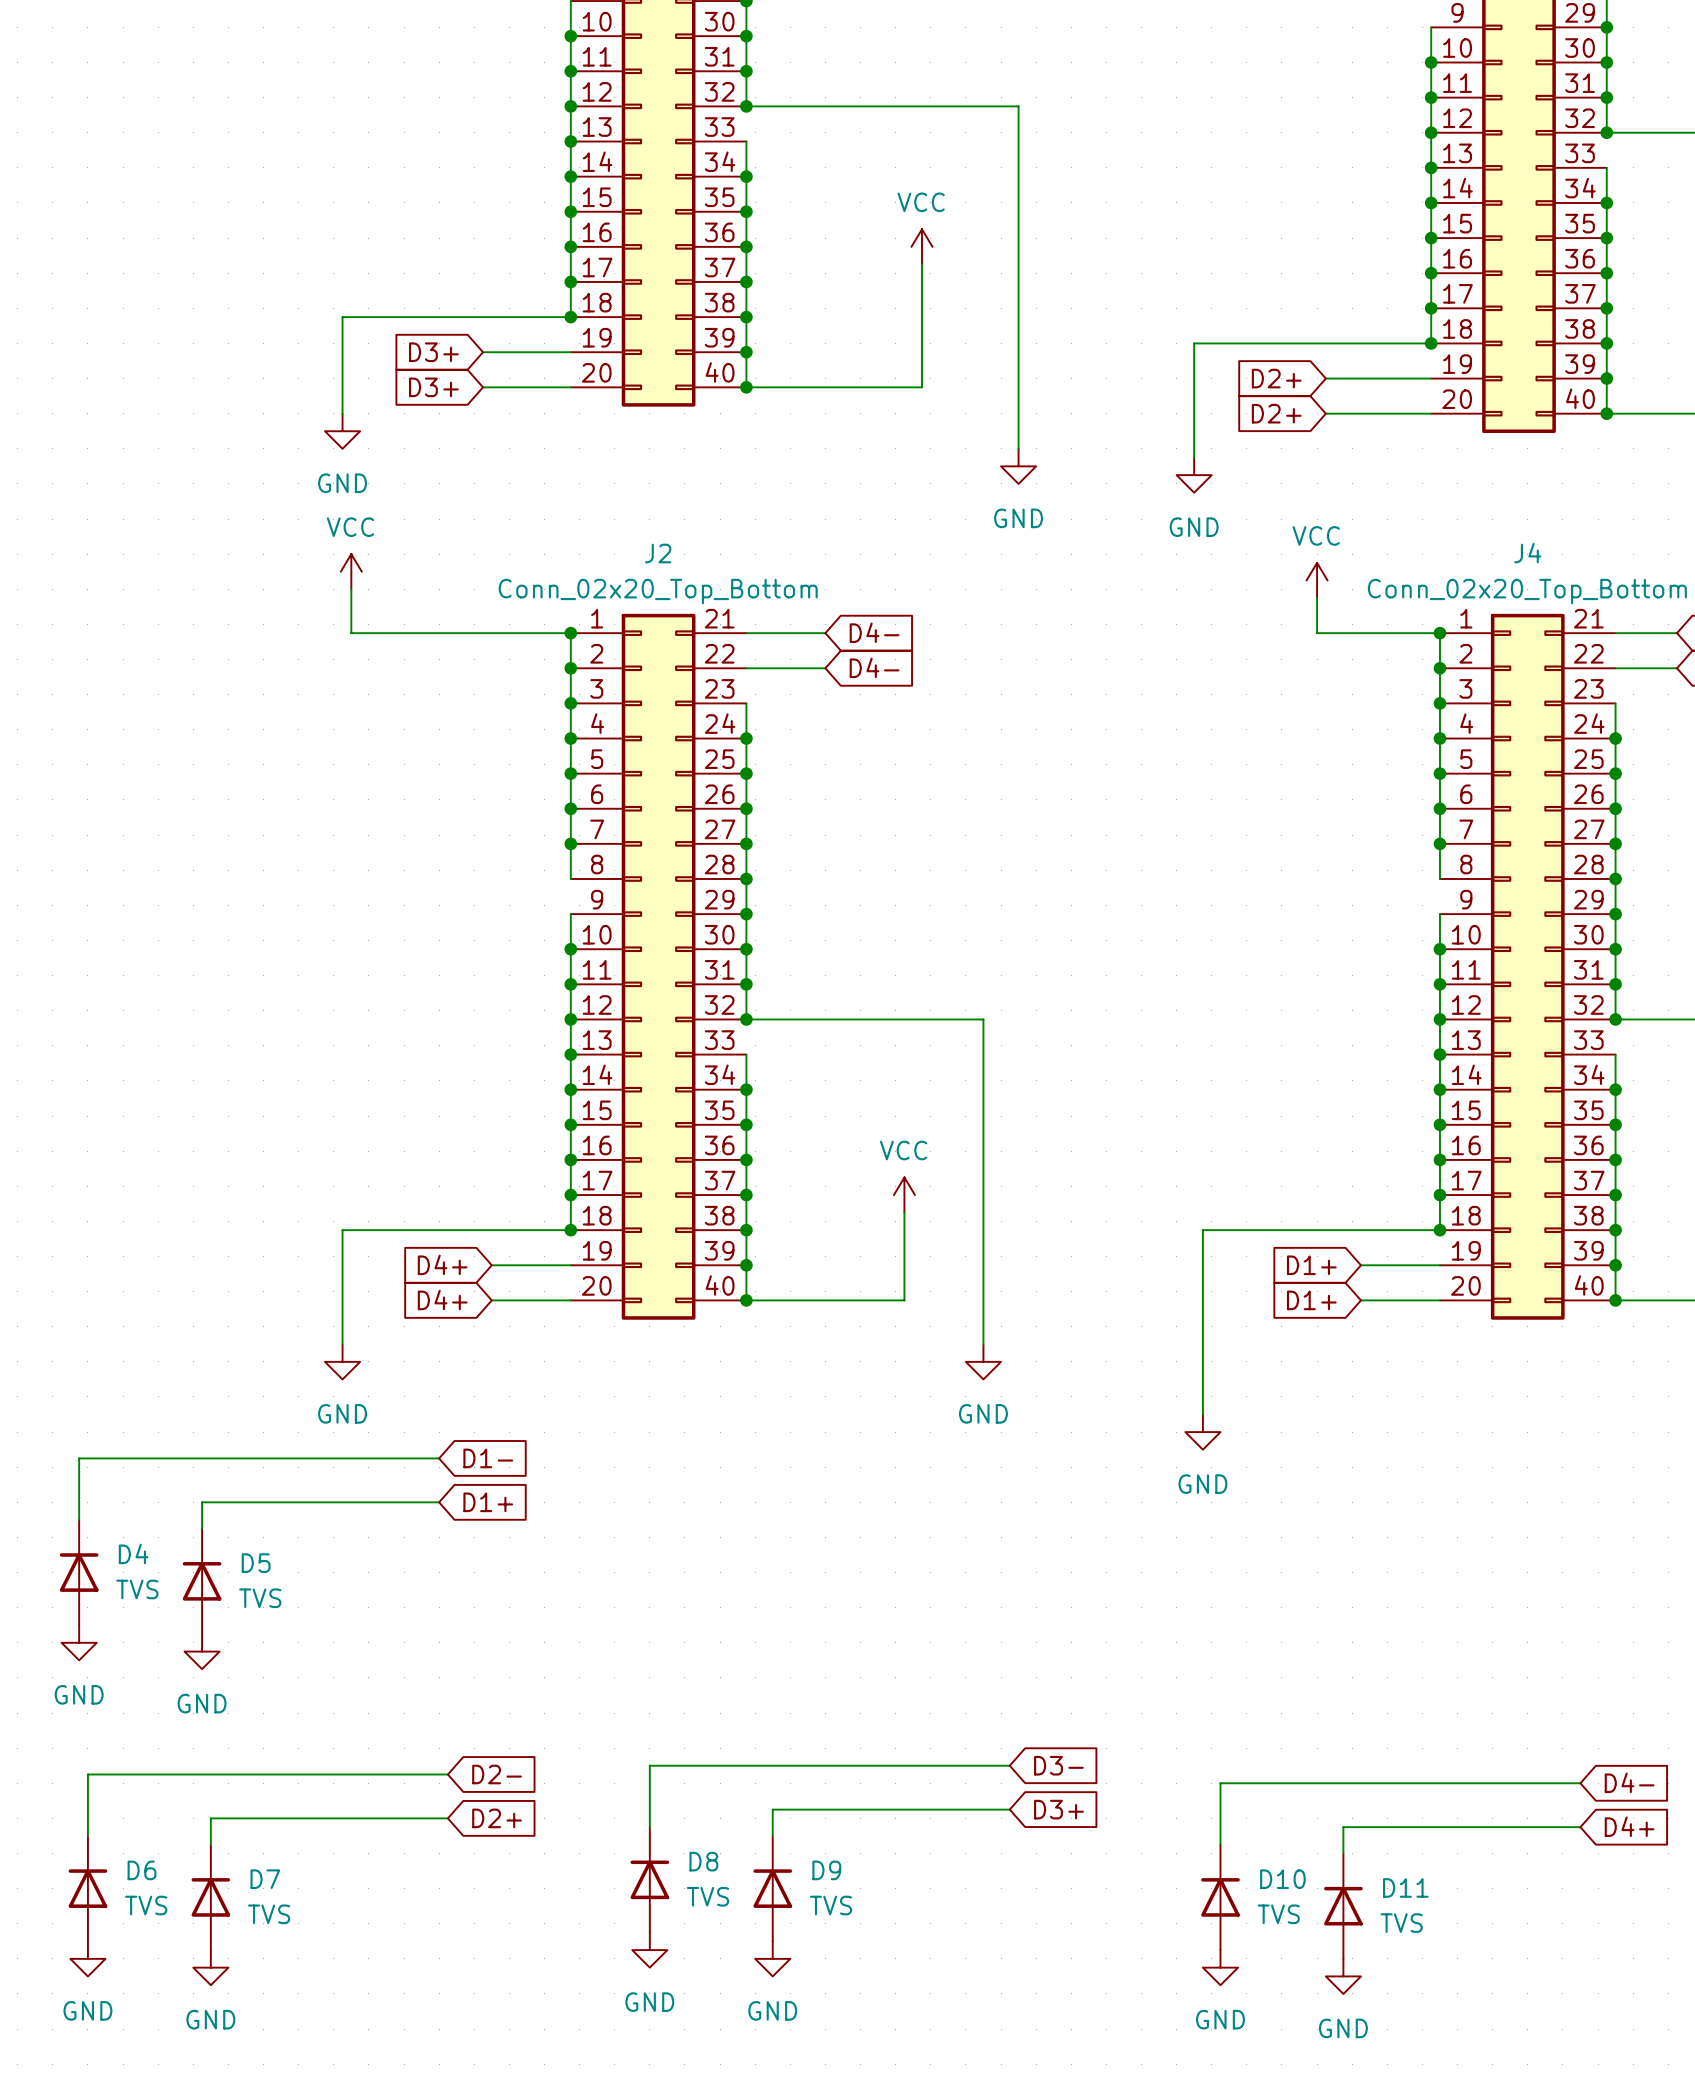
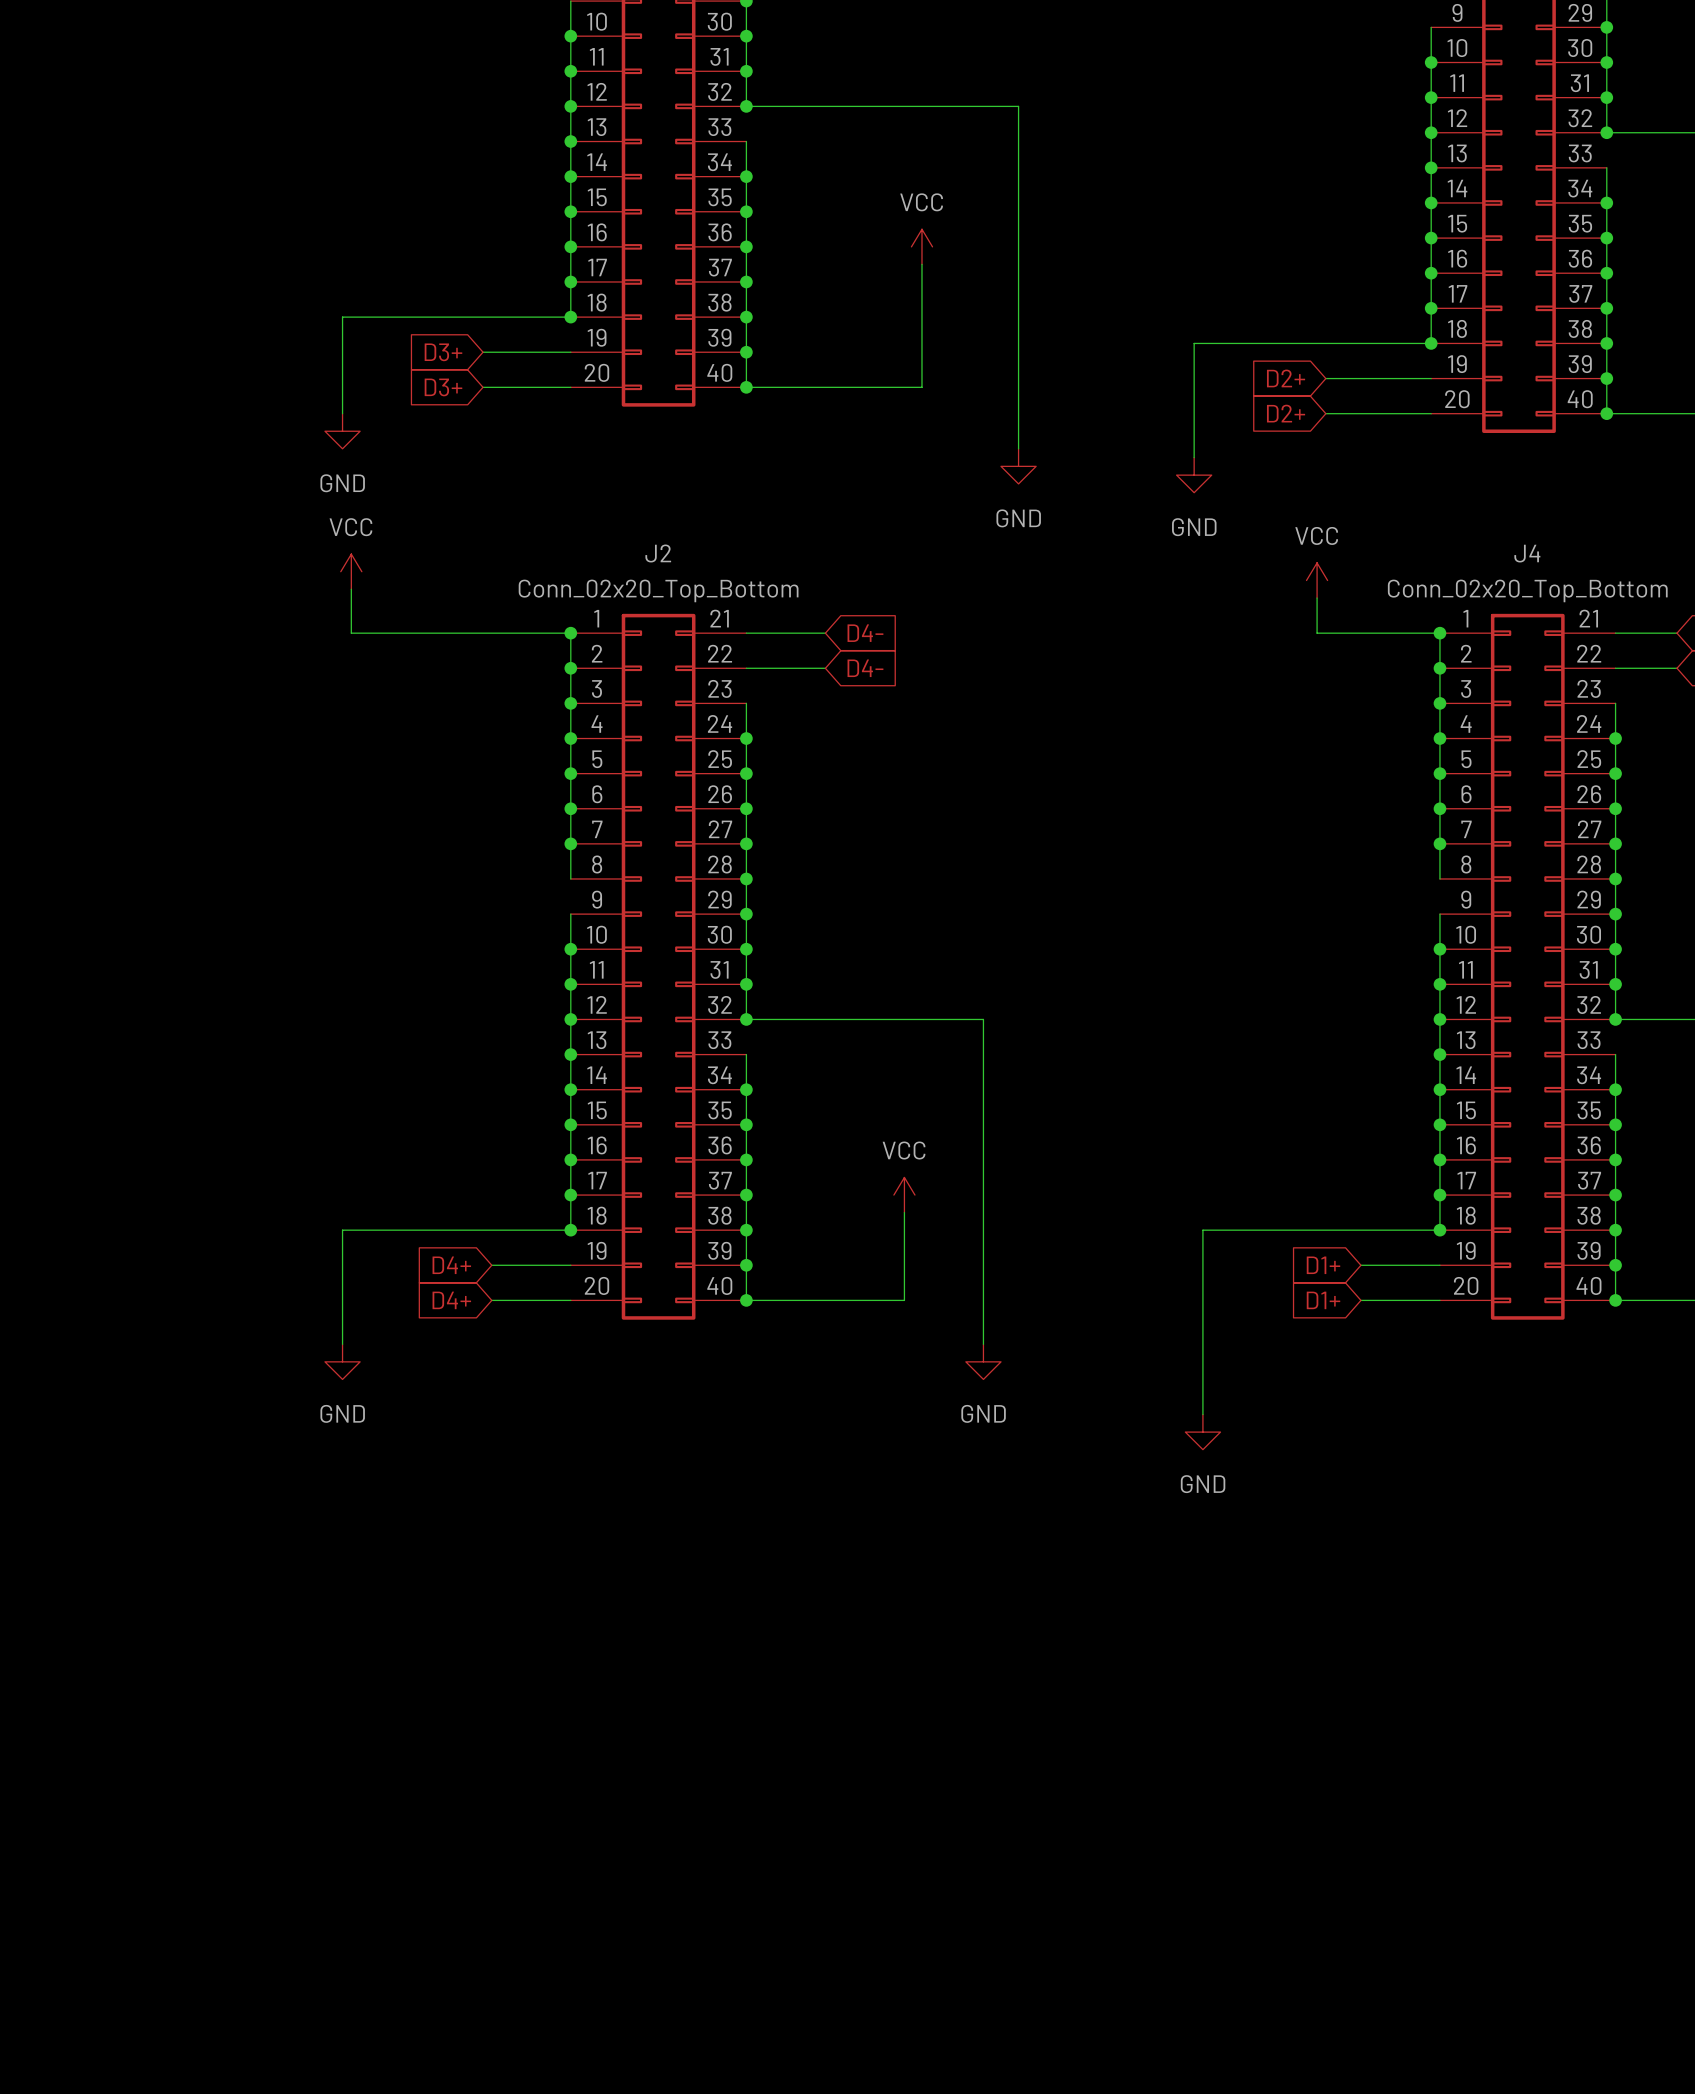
wire: (439, 1458) (79, 1458) (79, 1519) -> none
global label: D1- (488, 1458) -> none
wire: (439, 1502) (202, 1502) (202, 1528) -> none
global label: D1+ (488, 1502) -> none
D4: TVS (79, 1572) -> none
D5: TVS (202, 1581) -> none
power symbol: GND (79, 1642) -> none
power symbol: GND (202, 1651) -> none
wire: (1009, 1765) (649, 1765) (649, 1827) -> none
global label: D3- (1058, 1765) -> none
wire: (447, 1774) (87, 1774) (87, 1835) -> none
global label: D2- (497, 1774) -> none
global label: D4- (1629, 1782) -> none
wire: (1580, 1783) (1220, 1783) (1220, 1844) -> none
wire: (1009, 1809) (772, 1809) (772, 1835) -> none
global label: D3+ (1058, 1809) -> none
wire: (447, 1818) (210, 1818) (210, 1844) -> none
global label: D2+ (497, 1818) -> none
global label: D4+ (1629, 1826) -> none
wire: (1580, 1827) (1343, 1827) (1343, 1853) -> none
D8: TVS (649, 1879) -> none
D6: TVS (87, 1888) -> none
D9: TVS (772, 1888) -> none
D7: TVS (210, 1897) -> none
D10: TVS (1220, 1897) -> none
D11: TVS (1343, 1906) -> none
power symbol: GND (649, 1950) -> none
power symbol: GND (87, 1958) -> none
power symbol: GND (772, 1958) -> none
power symbol: GND (210, 1967) -> none
power symbol: GND (1220, 1967) -> none
power symbol: GND (1343, 1976) -> none

